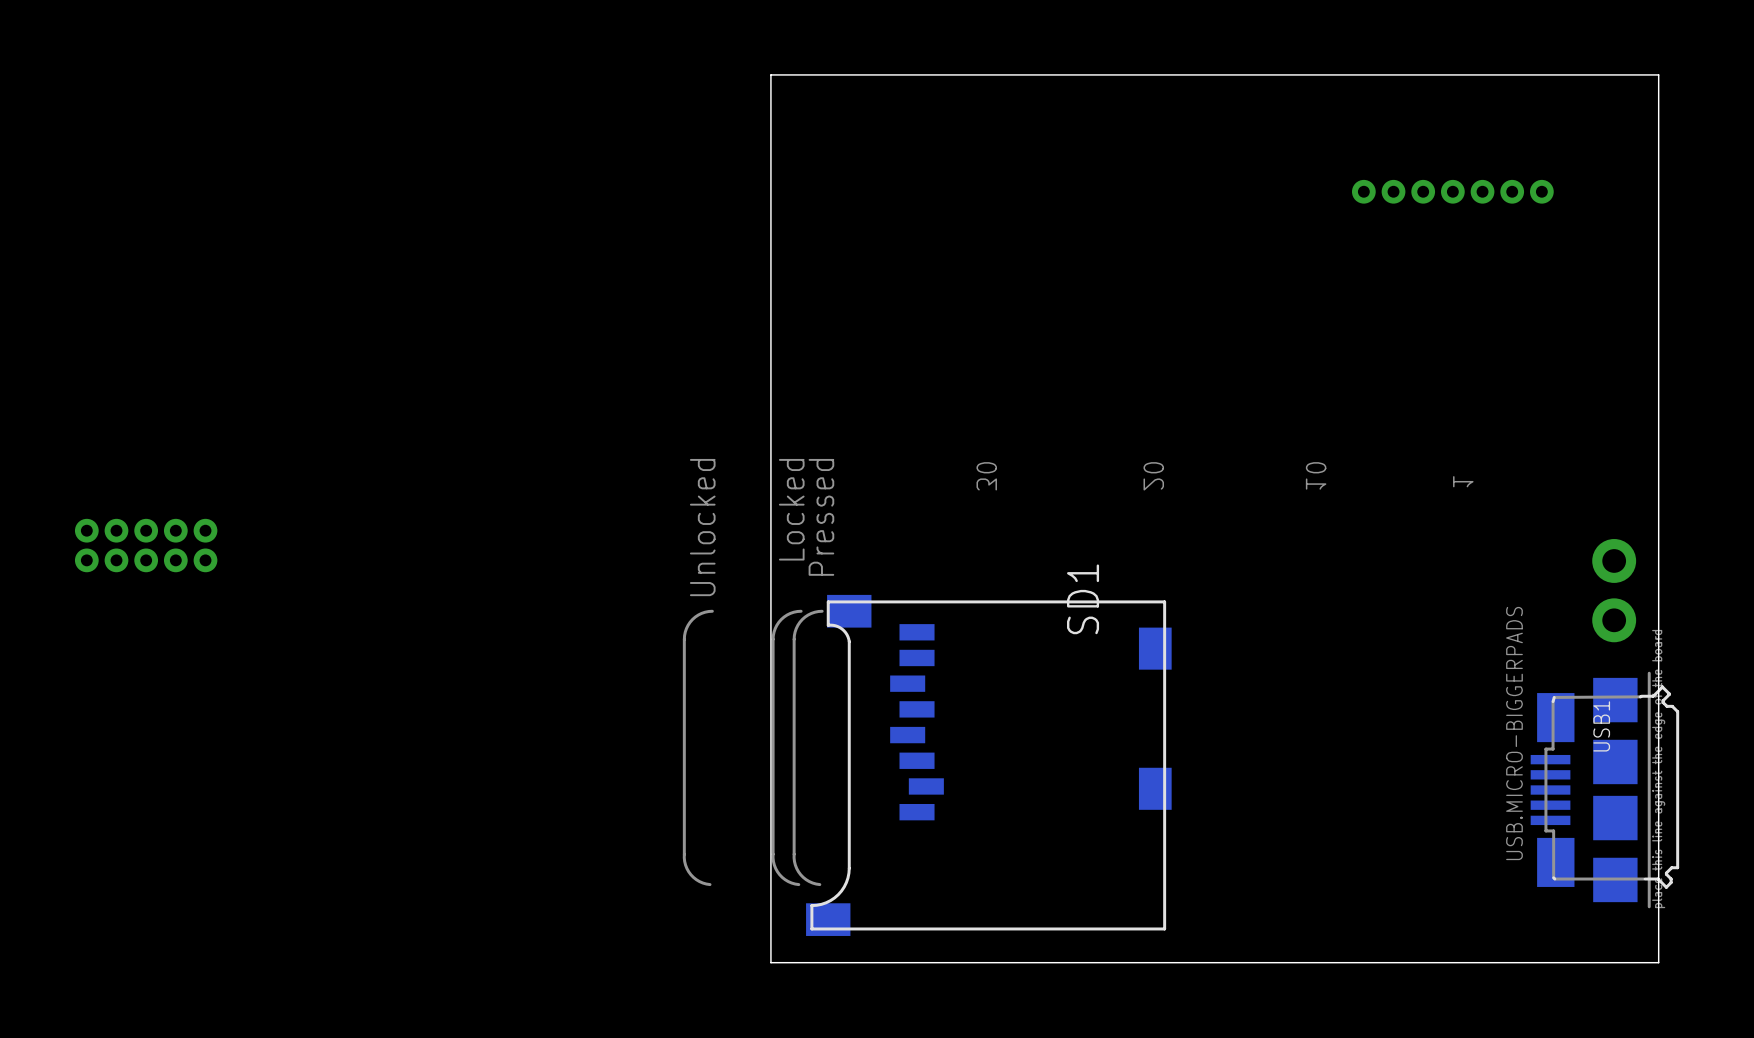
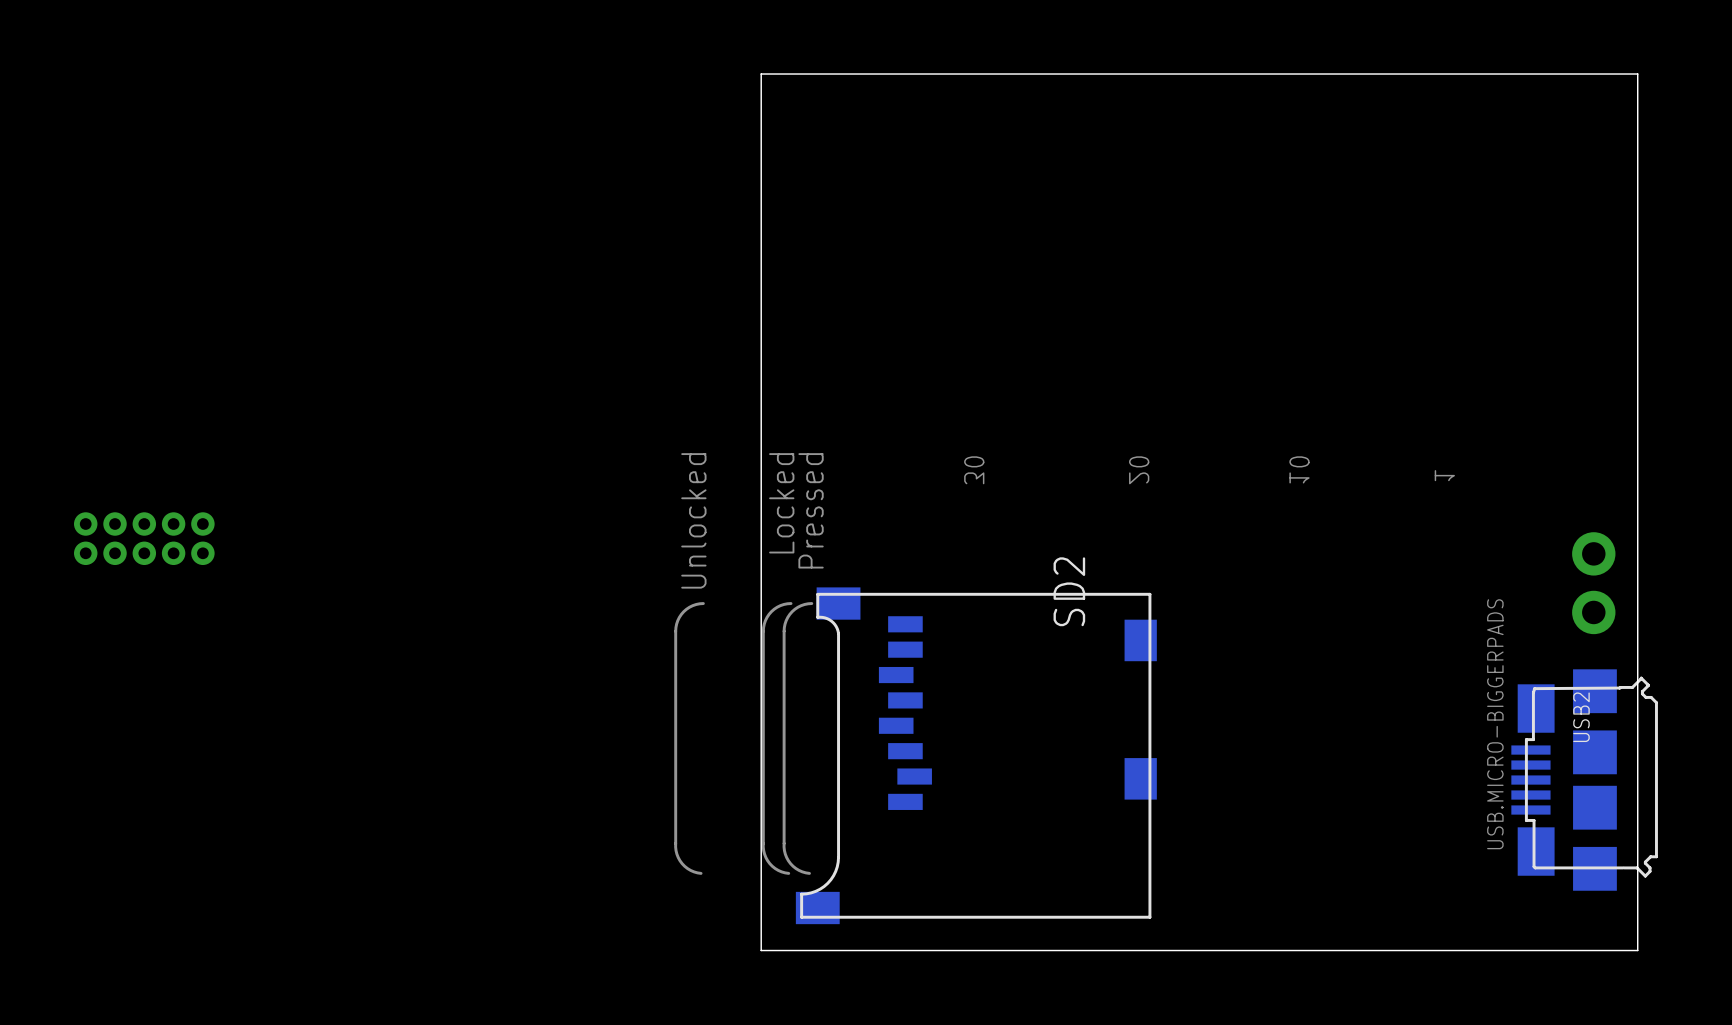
part: (1452, 191) -> none
SD1 name: SD1 (1083, 599) -> SD2 (1069, 591)
USB1: USB.MICRO-BIGGERPADS (1604, 790) -> none
USB2: none -> USB.MICRO-BIGGERPADS (1584, 780)

